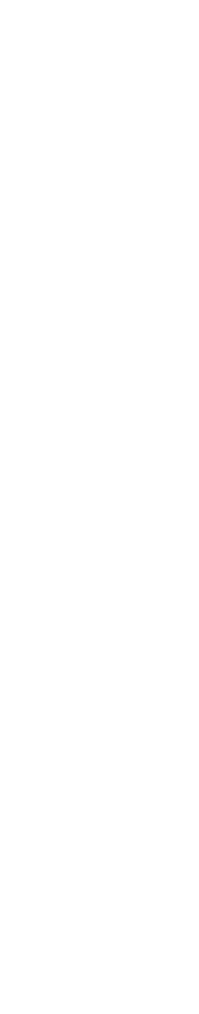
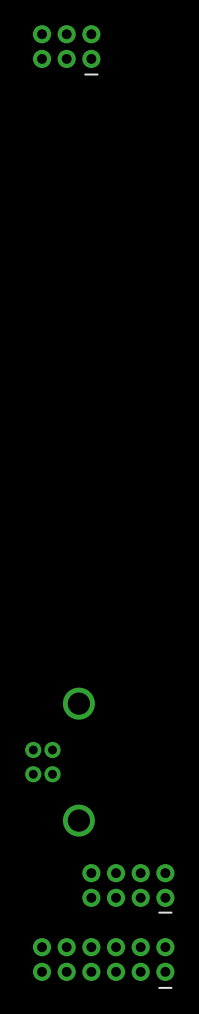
part: none -> (66, 50)
part: none -> (60, 762)
part: none -> (128, 888)
part: none -> (103, 963)

